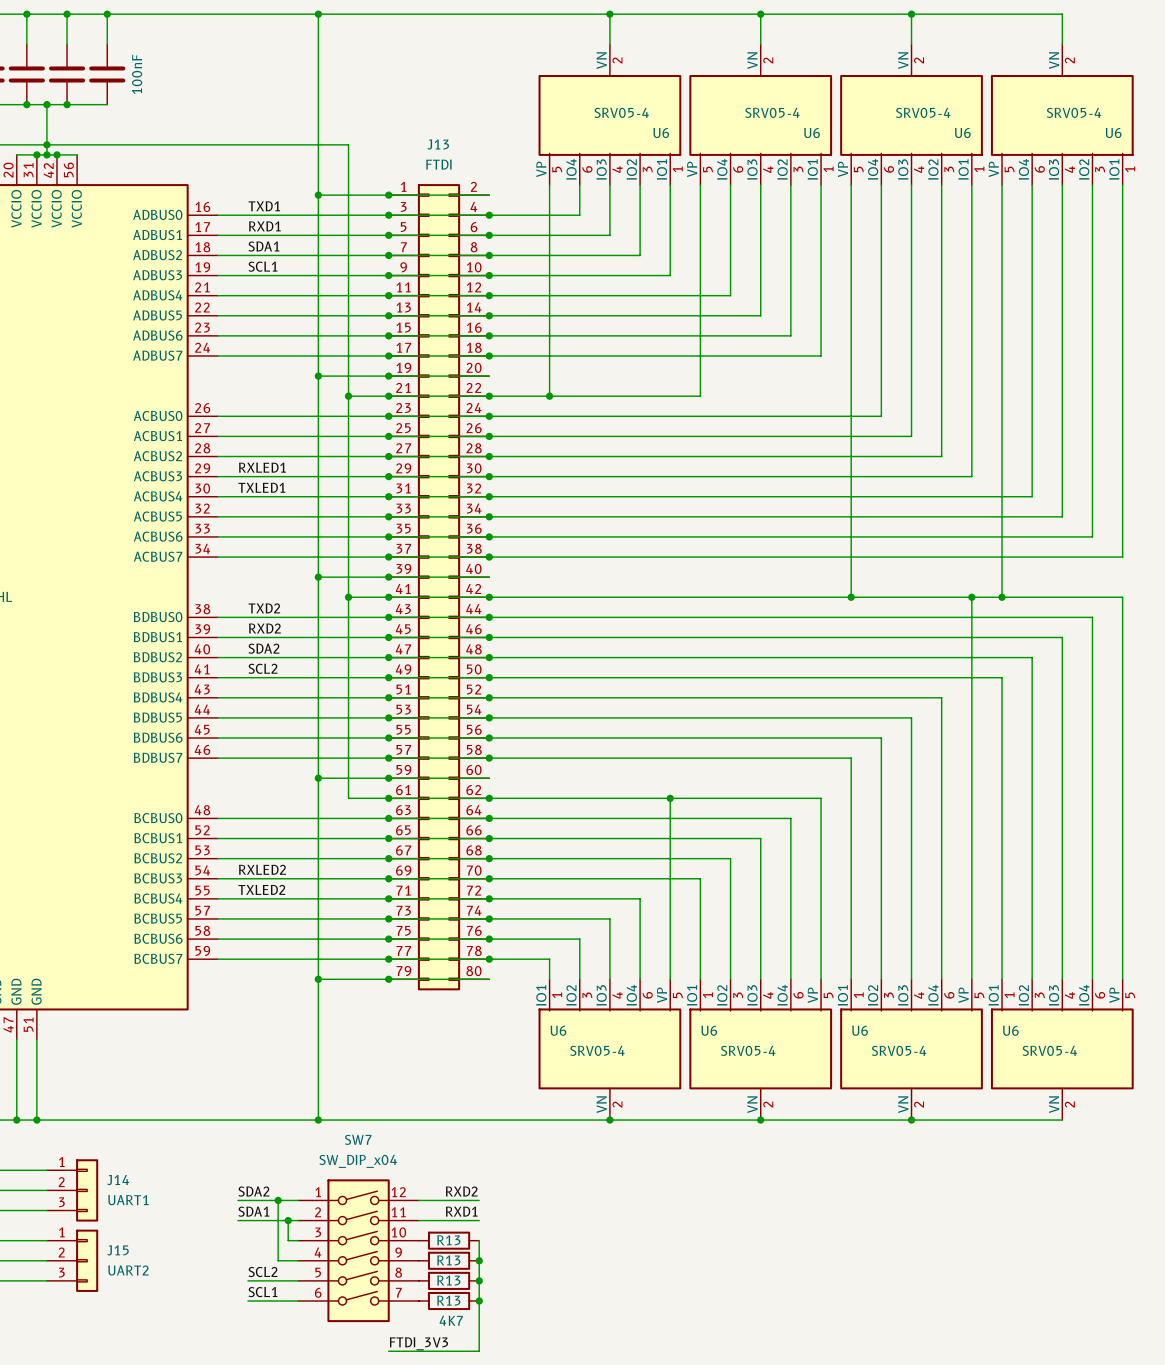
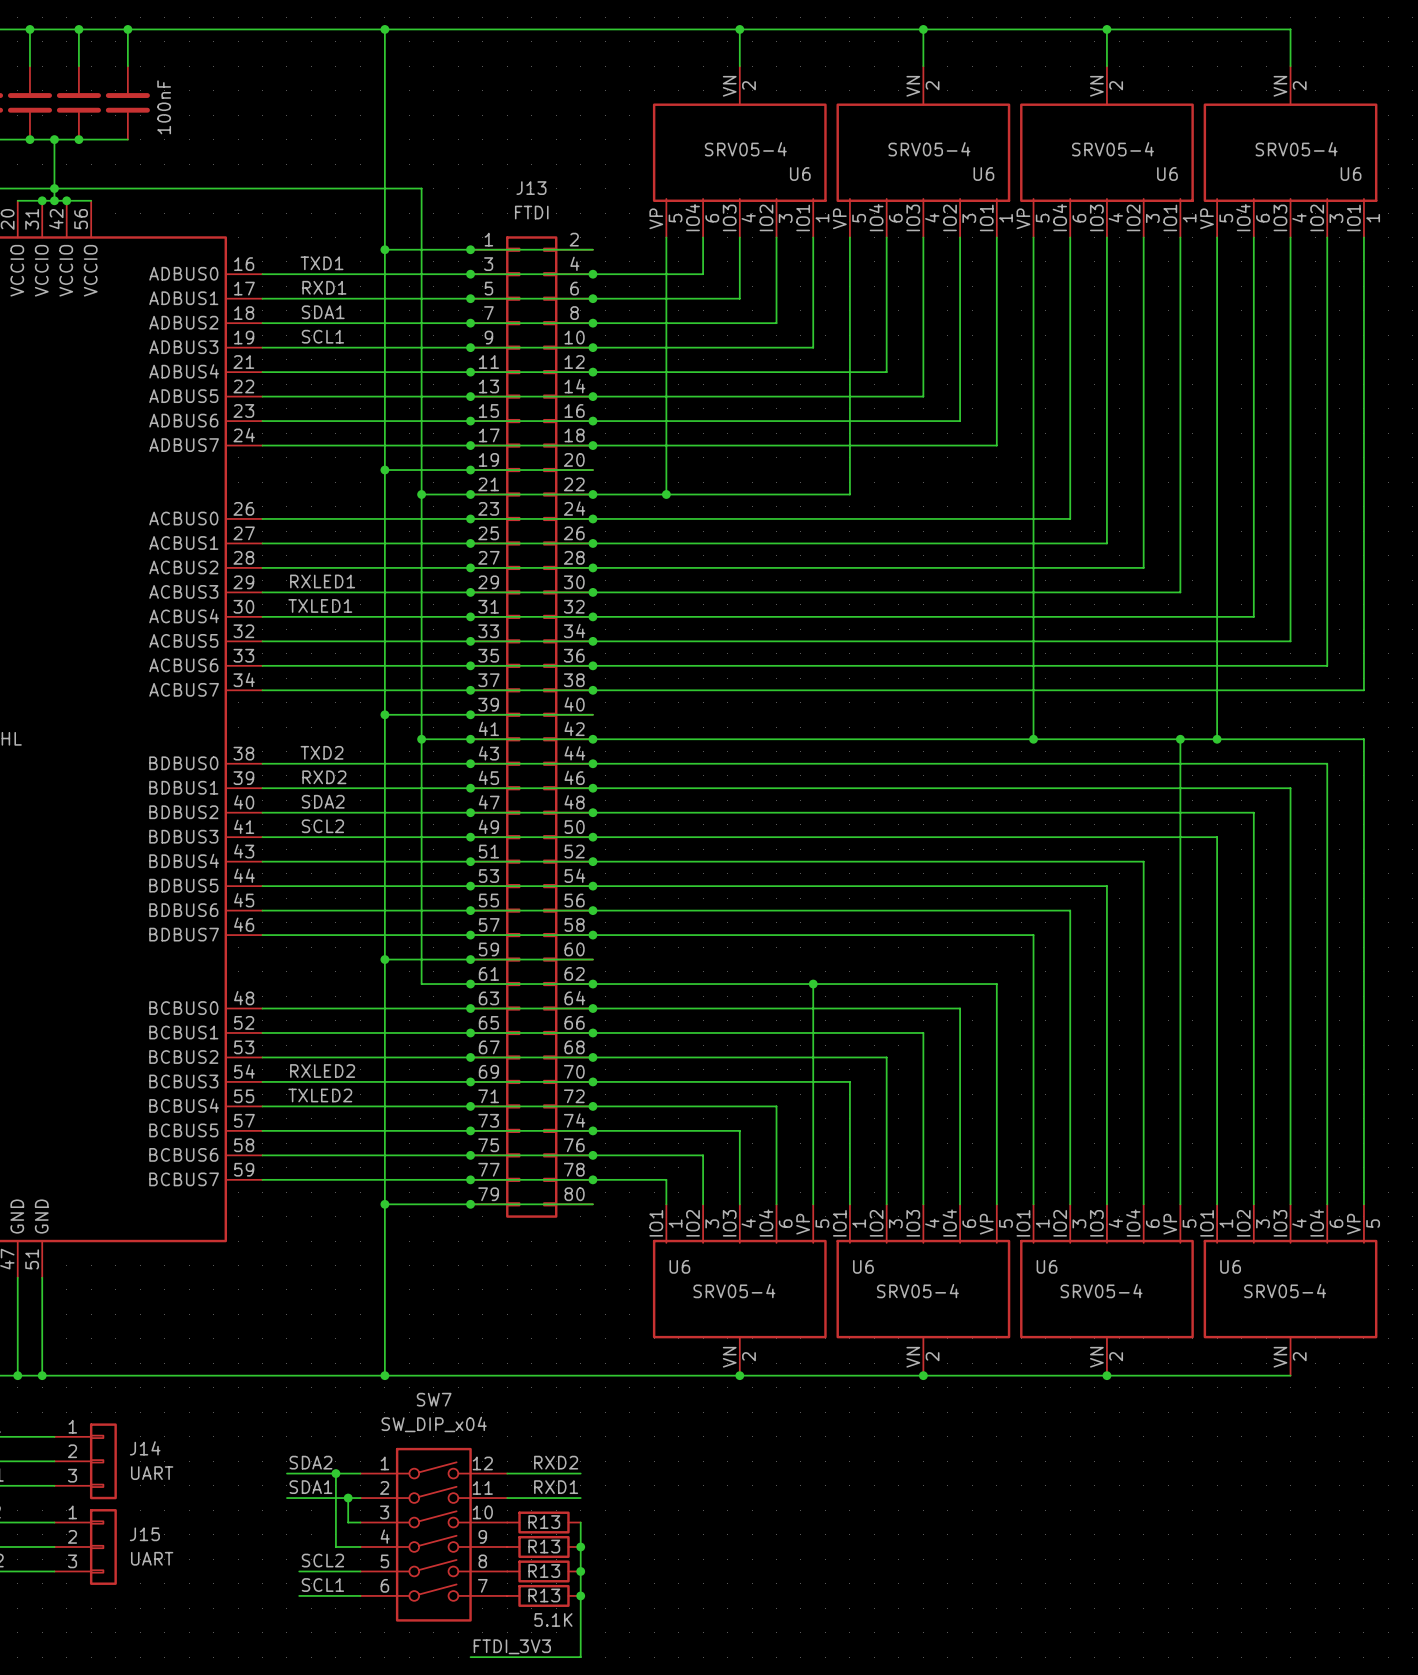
J14 value: UART1 (128, 1200) -> UART (152, 1473)
J15 value: UART2 (128, 1270) -> UART (152, 1558)
R13 value: 4K7 (451, 1320) -> 5.1K (553, 1619)

